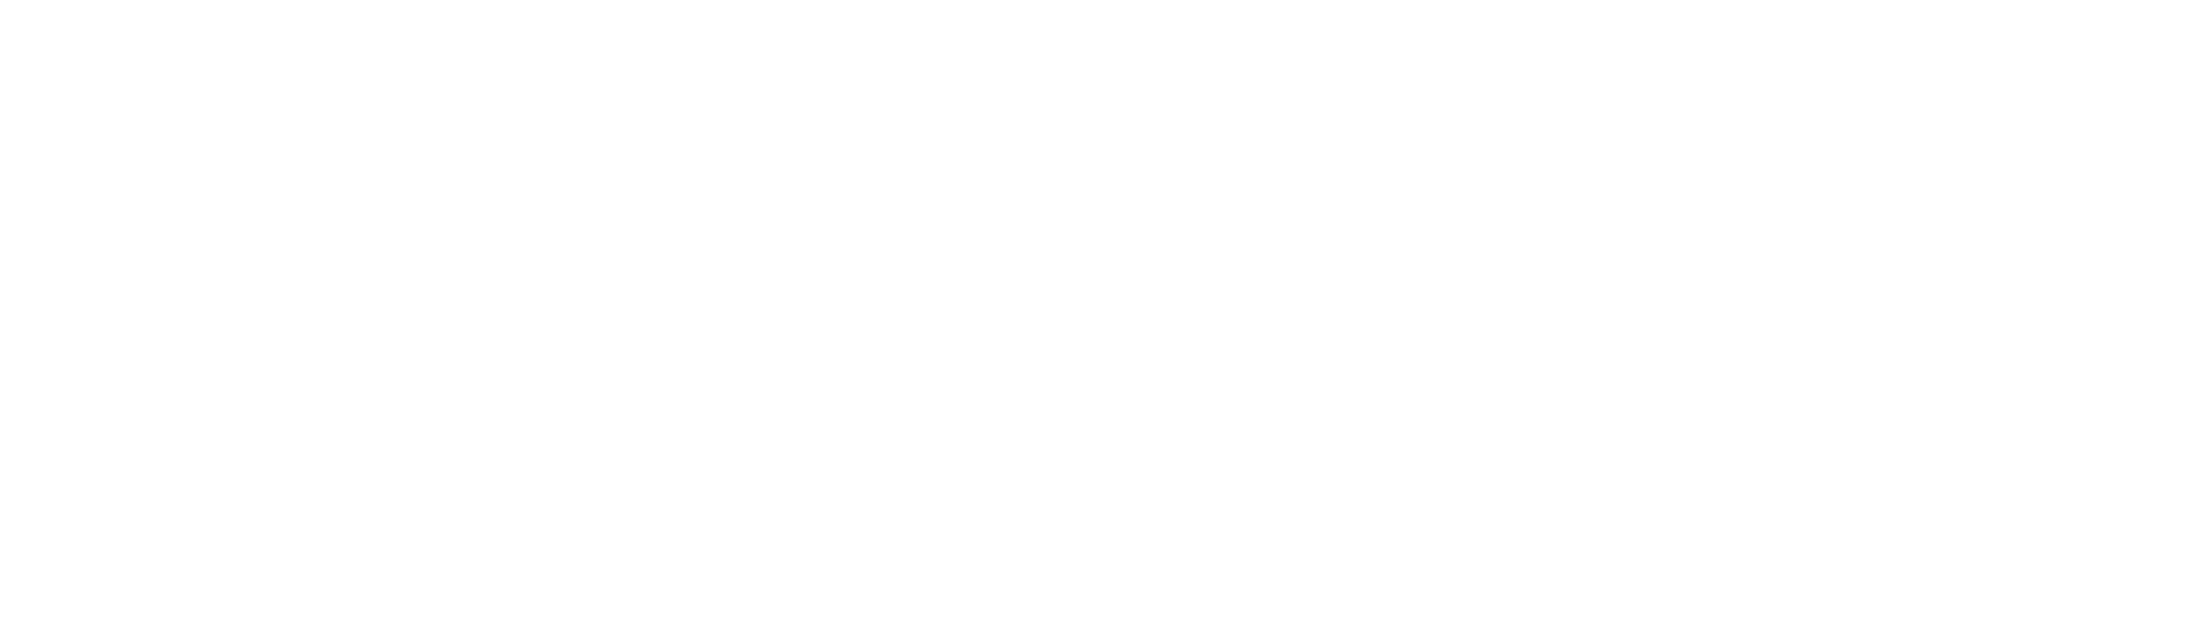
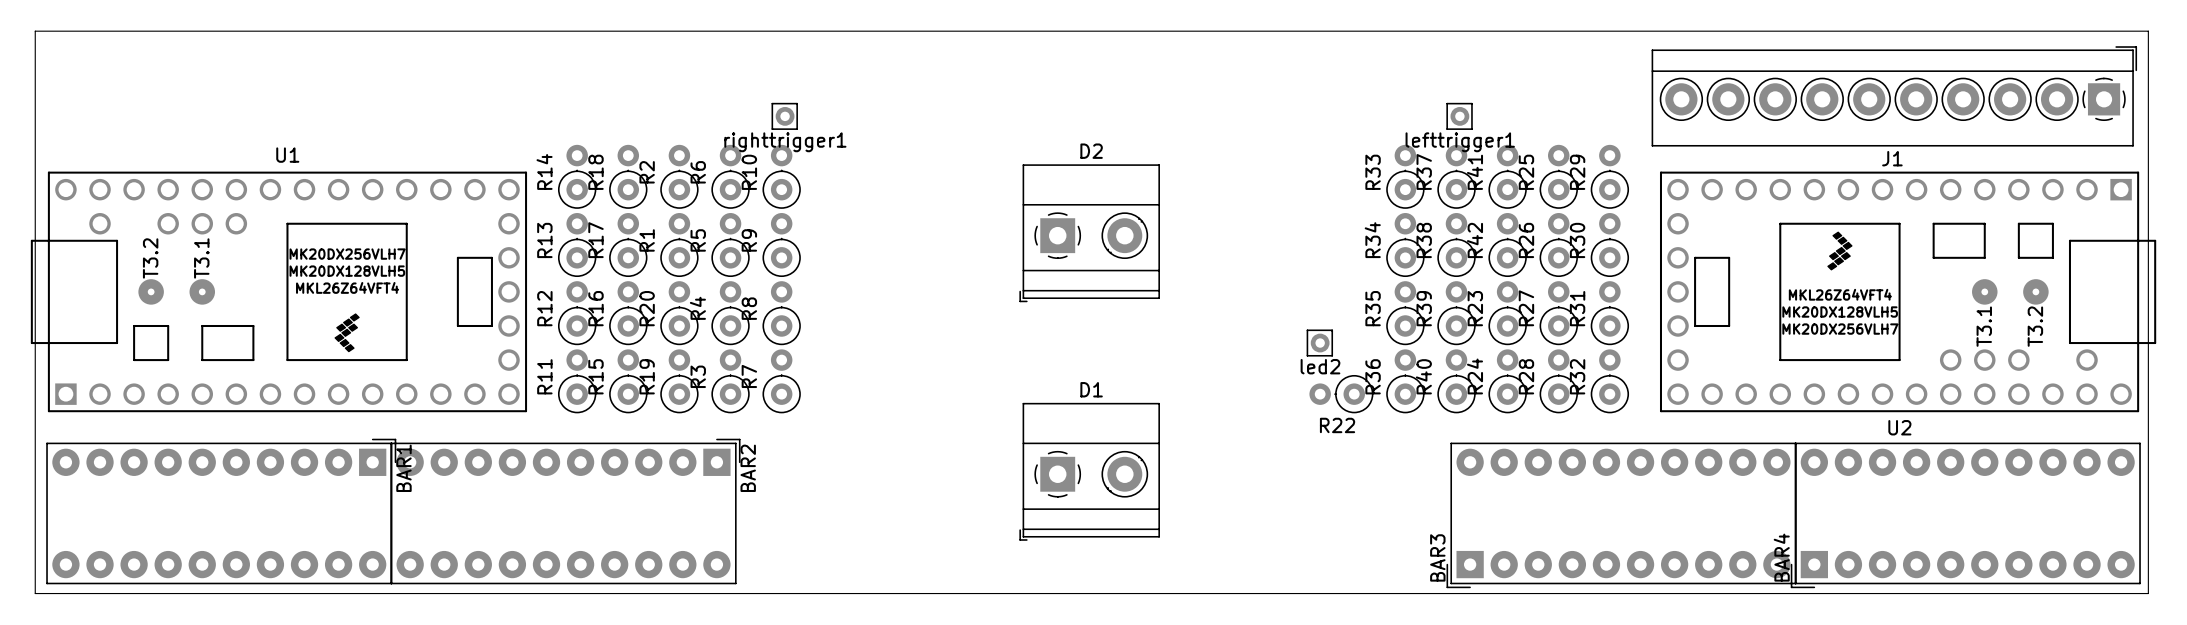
board edge: none -> (35, 31) (35, 593) (2148, 593) (2148, 31) (35, 31)
J1: none -> (1894, 96)
righttrigger1: none -> (784, 116)
lefttrigger1: none -> (1459, 116)
R14: none -> (577, 176)
R18: none -> (628, 176)
R2: none -> (679, 176)
R6: none -> (730, 176)
R10: none -> (781, 176)
R33: none -> (1405, 176)
R37: none -> (1456, 176)
R41: none -> (1507, 176)
R25: none -> (1558, 176)
R29: none -> (1609, 176)
D2: none -> (1089, 233)
R13: none -> (577, 245)
R17: none -> (628, 245)
R1: none -> (679, 245)
R5: none -> (730, 245)
R9: none -> (781, 245)
R34: none -> (1405, 245)
R38: none -> (1456, 245)
R42: none -> (1507, 245)
R26: none -> (1558, 245)
R30: none -> (1609, 245)
U1: none -> (278, 291)
U2: none -> (1908, 291)
R12: none -> (577, 313)
R16: none -> (628, 313)
R20: none -> (679, 313)
R4: none -> (730, 313)
R8: none -> (781, 313)
R35: none -> (1405, 313)
R39: none -> (1456, 313)
R23: none -> (1507, 313)
R27: none -> (1558, 313)
R31: none -> (1609, 313)
led2: none -> (1319, 343)
R11: none -> (577, 381)
R15: none -> (628, 381)
R19: none -> (679, 381)
R3: none -> (730, 381)
R7: none -> (781, 381)
R36: none -> (1405, 381)
R40: none -> (1456, 381)
R24: none -> (1507, 381)
R28: none -> (1558, 381)
R32: none -> (1609, 381)
R22: none -> (1341, 394)
D1: none -> (1089, 471)
BAR1: none -> (221, 511)
BAR2: none -> (565, 511)
BAR3: none -> (1621, 515)
BAR4: none -> (1965, 515)

